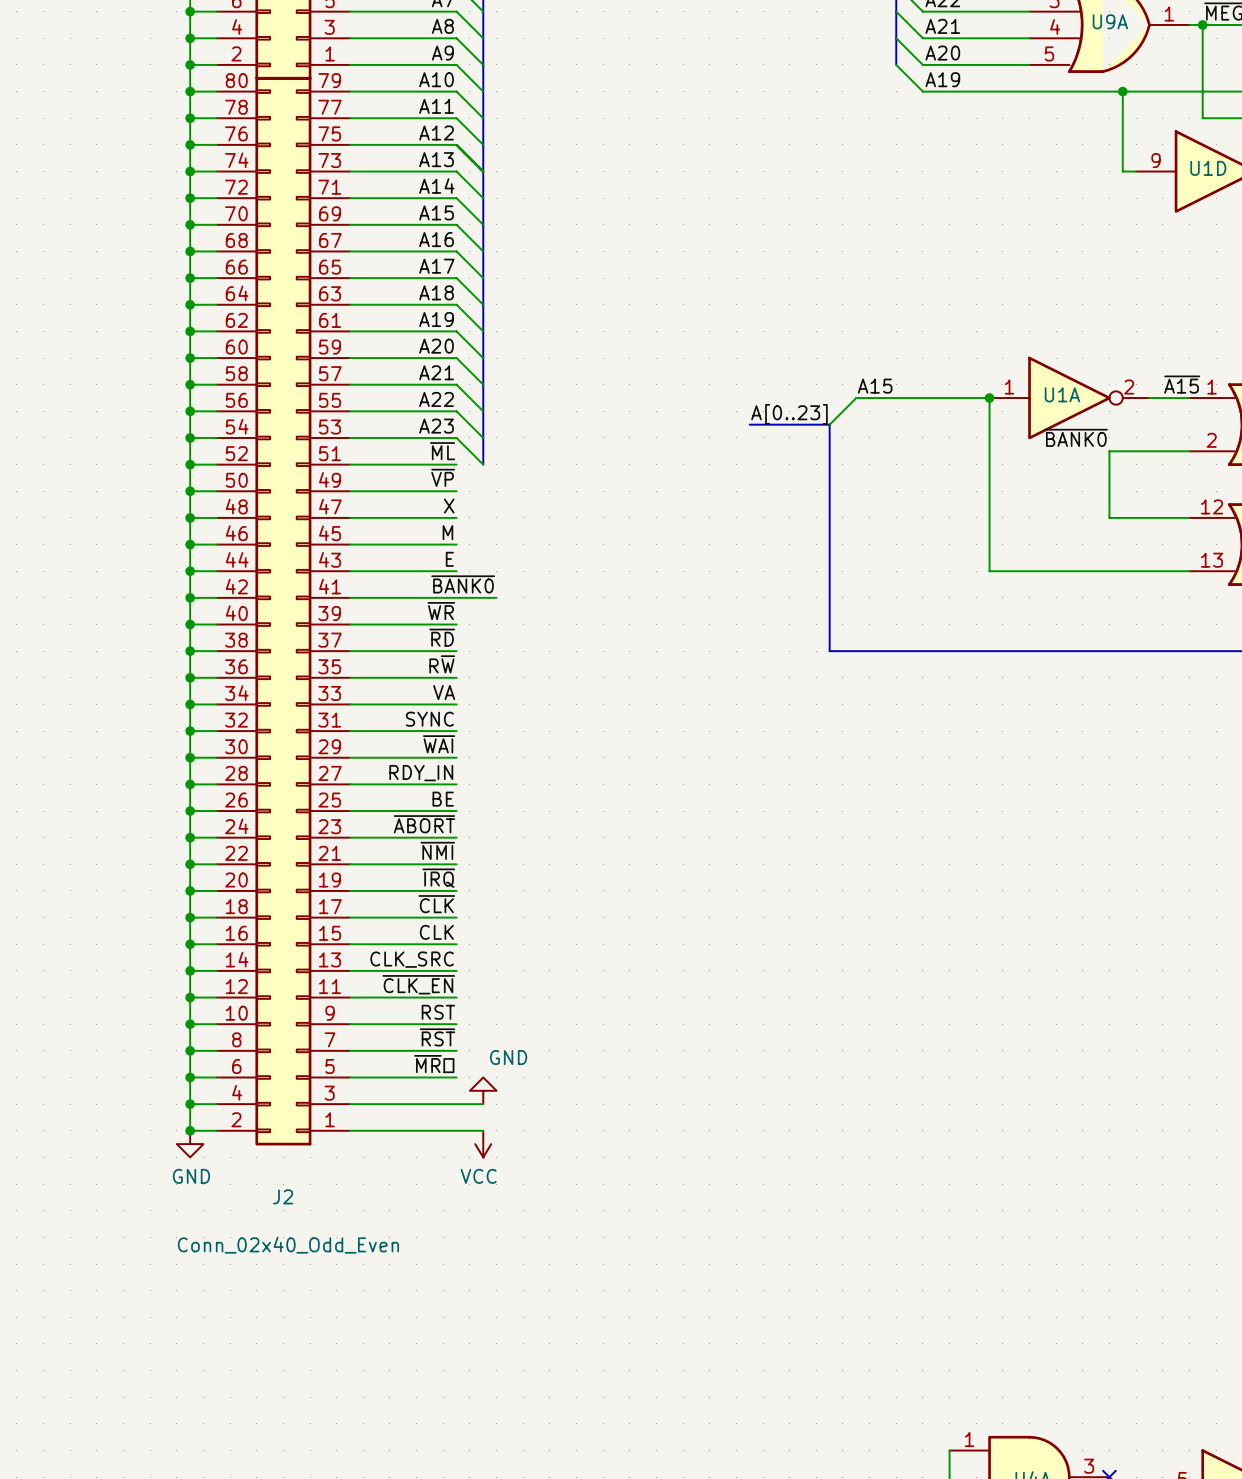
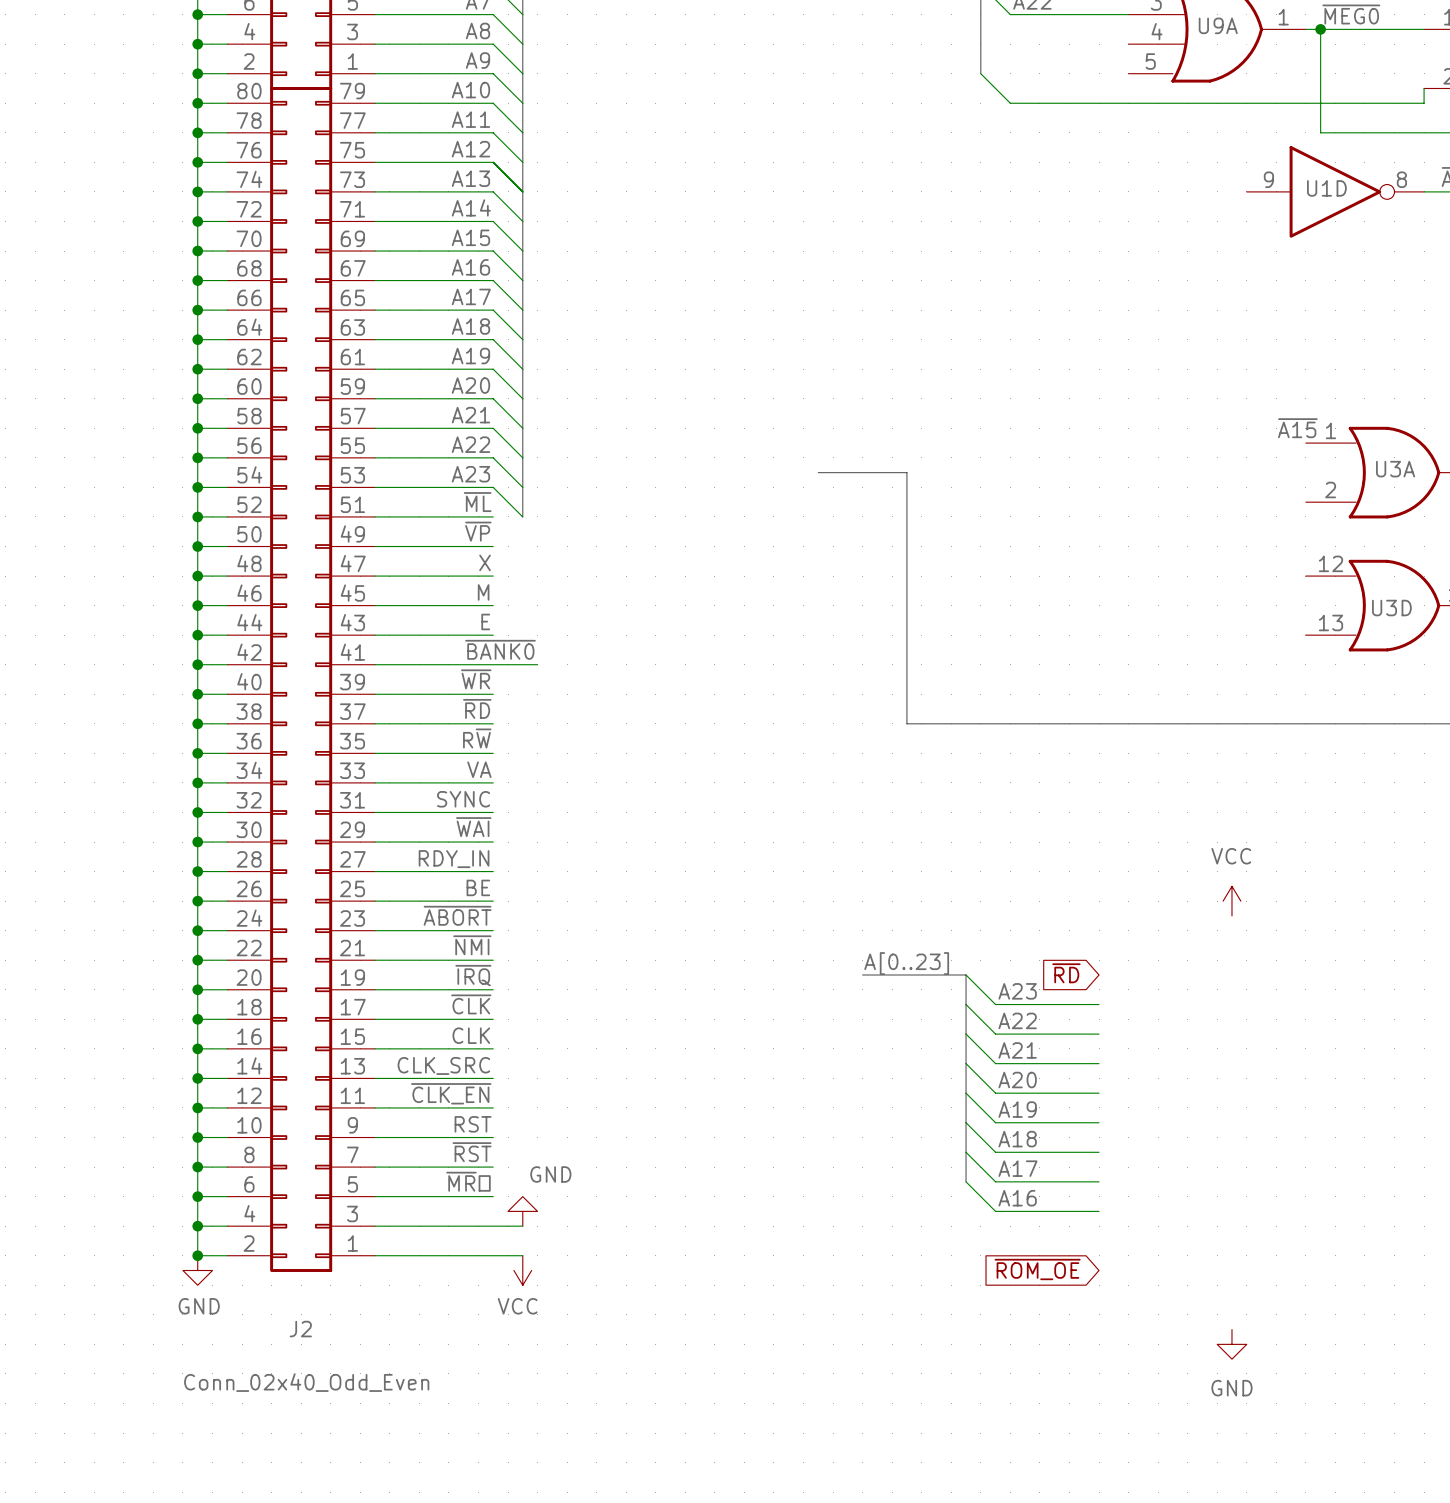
wire: (896, 11) (922, 38) (1029, 38) -> none
label: A21 (942, 26) -> none
wire: (896, 38) (922, 64) (1029, 64) -> none
label: A20 (942, 53) -> none
label: A19 (942, 79) -> none
wire: (1122, 91) (1122, 171) (1136, 171) -> none
junction: (1122, 91) -> none
label: A15 (875, 386) -> none
junction: (989, 398) -> none
U1A: (1069, 398) -> none
wire: (1149, 398) (1189, 398) -> none
label: A[0..23] (789, 414) -> none
wire: (829, 424) (856, 398) (989, 398) (989, 571) (1189, 571) -> none
label: ~{BANK0} (1076, 437) -> none
wire: (1189, 451) (1109, 451) (1109, 517) (1189, 517) -> none
power symbol: none -> VCC (1231, 901)
label: none -> A[0..23] (906, 963)
global label: none -> ~{RD} (1066, 973)
bus: none -> (862, 974) (966, 974) (966, 1181)
wire: none -> (966, 974) (995, 1004) (1099, 1004)
label: none -> A23 (1017, 991)
wire: none -> (966, 1004) (995, 1034) (1099, 1034)
label: none -> A22 (1017, 1020)
wire: none -> (966, 1034) (995, 1063) (1099, 1063)
label: none -> A21 (1017, 1050)
wire: none -> (966, 1063) (995, 1093) (1099, 1093)
label: none -> A20 (1017, 1080)
wire: none -> (966, 1093) (995, 1122) (1099, 1122)
label: none -> A19 (1017, 1109)
wire: none -> (966, 1122) (995, 1152) (1099, 1152)
label: none -> A18 (1017, 1139)
wire: none -> (966, 1152) (995, 1181) (1099, 1181)
label: none -> A17 (1017, 1168)
wire: none -> (966, 1181) (995, 1211) (1099, 1211)
label: none -> A16 (1017, 1198)
global label: none -> ~{ROM_OE} (1037, 1269)
power symbol: none -> GND (1231, 1344)

